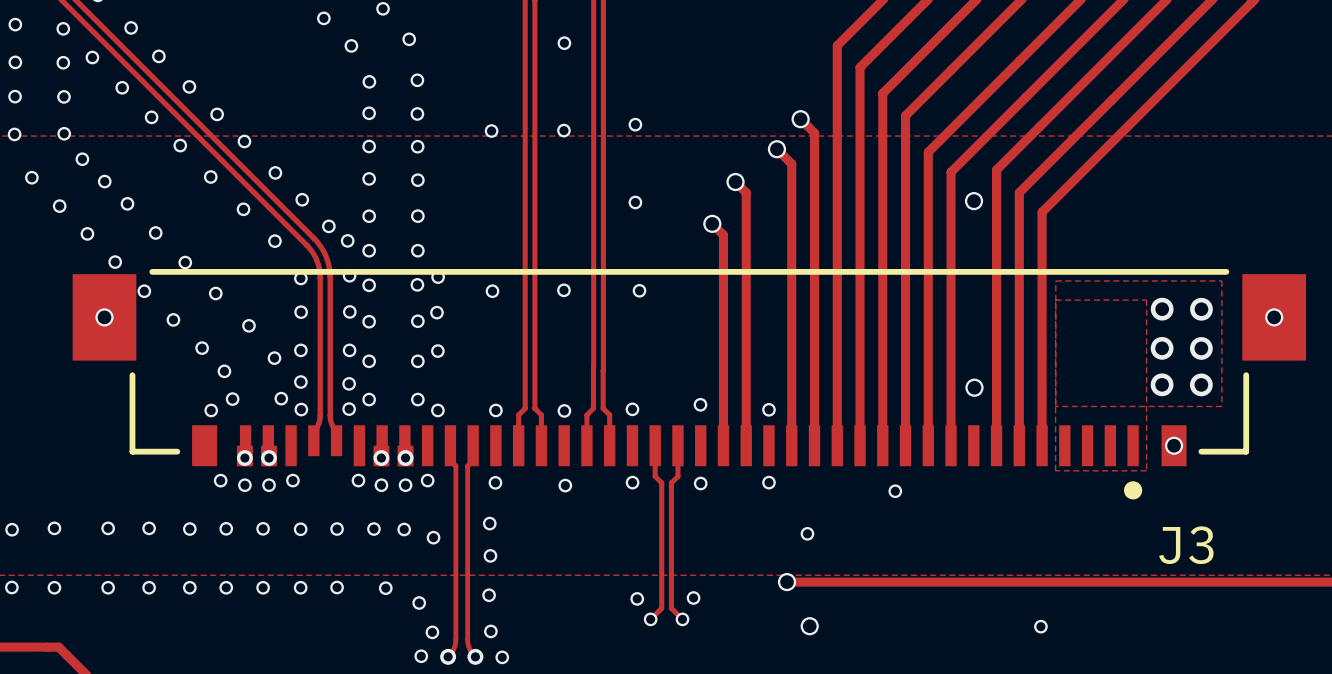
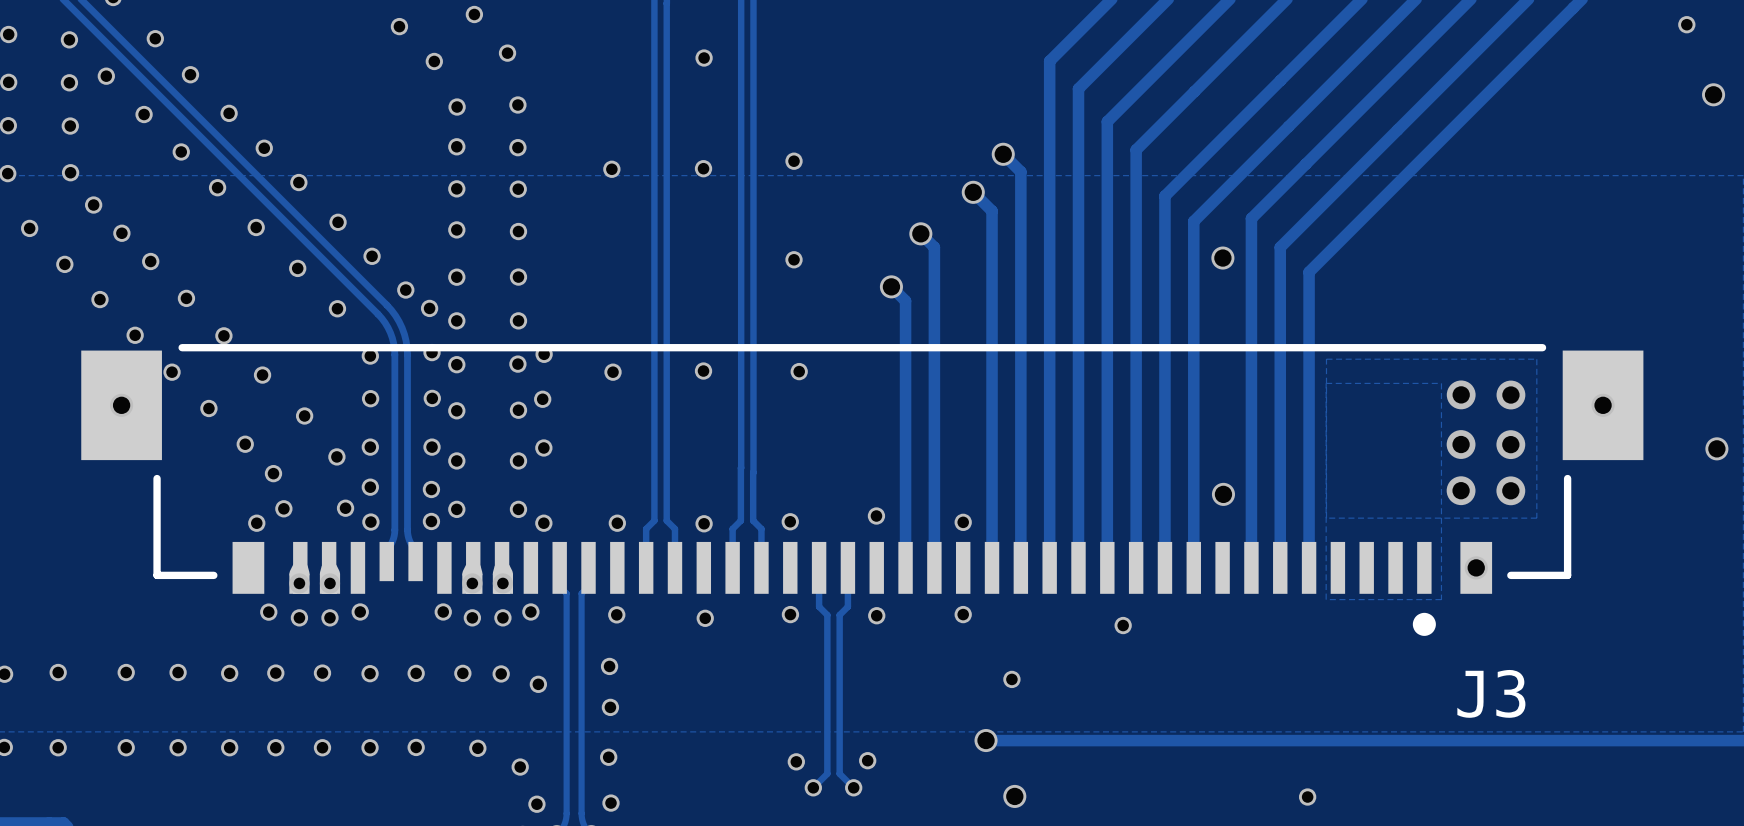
J3 footprint: [72, 269, 1307, 500] -> [81, 344, 1644, 636]

